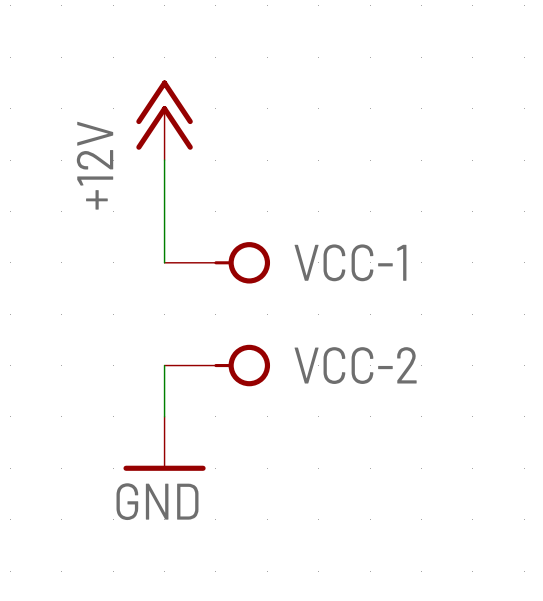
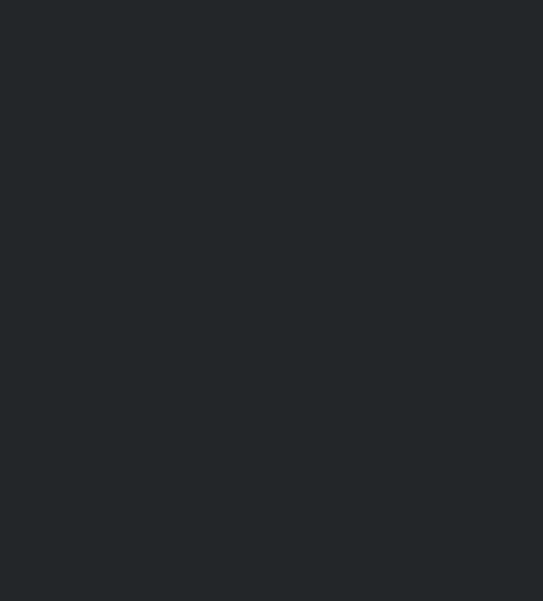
power symbol: +12V (164, 120) -> none
wire: (164, 160) (164, 262) -> none
VCC-1: (217, 262) -> none
wire: (164, 365) (164, 416) -> none
VCC-2: (217, 365) -> none
power symbol: GND (164, 443) -> none

